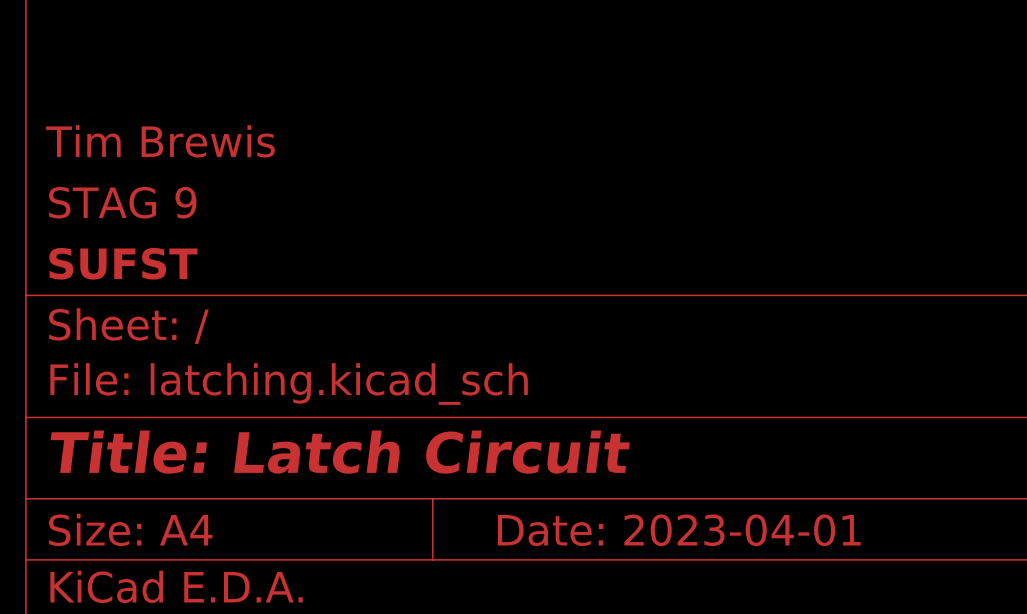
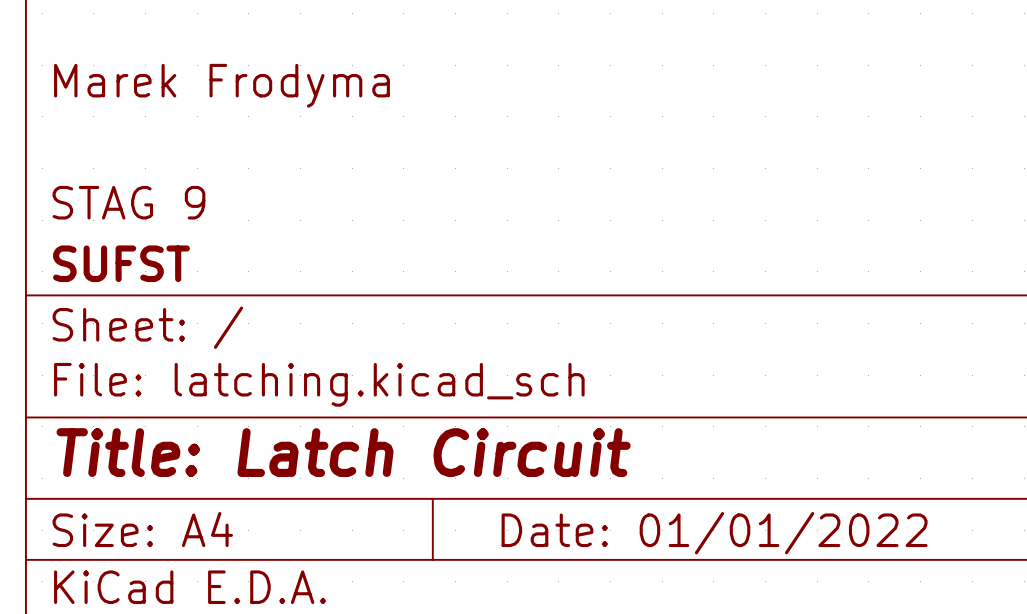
title block: none -> Marek Frodyma (221, 85)
title block: Tim Brewis (160, 141) -> none
title block: Date: 2023-04-01 (679, 530) -> Date: 01/01/2022 (714, 533)

